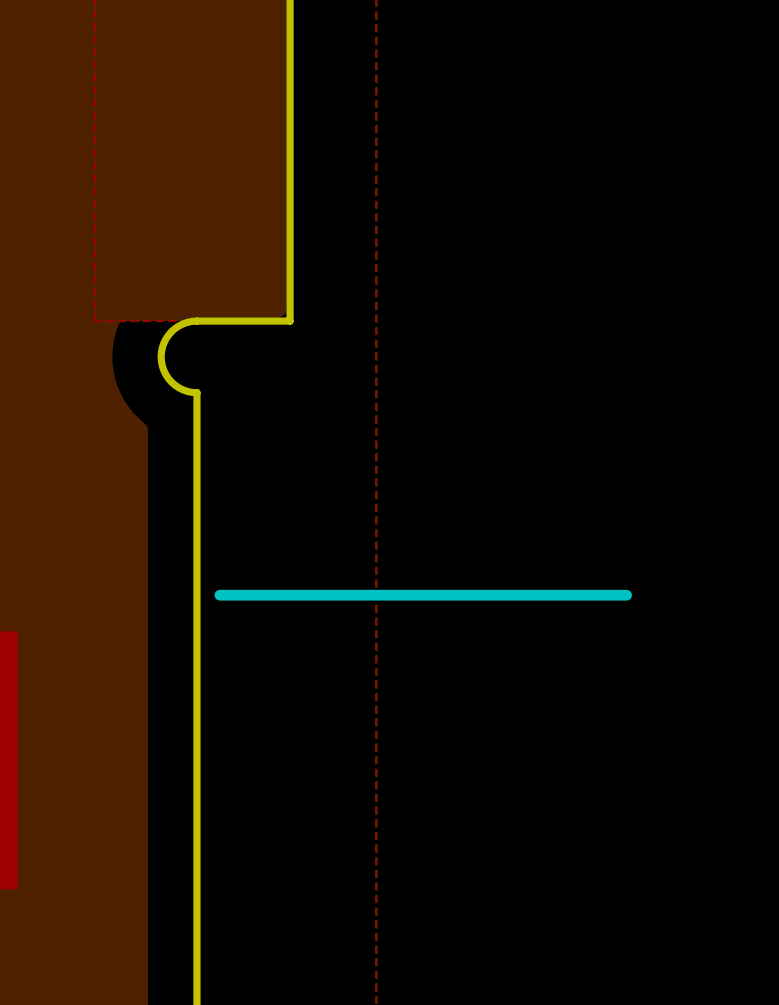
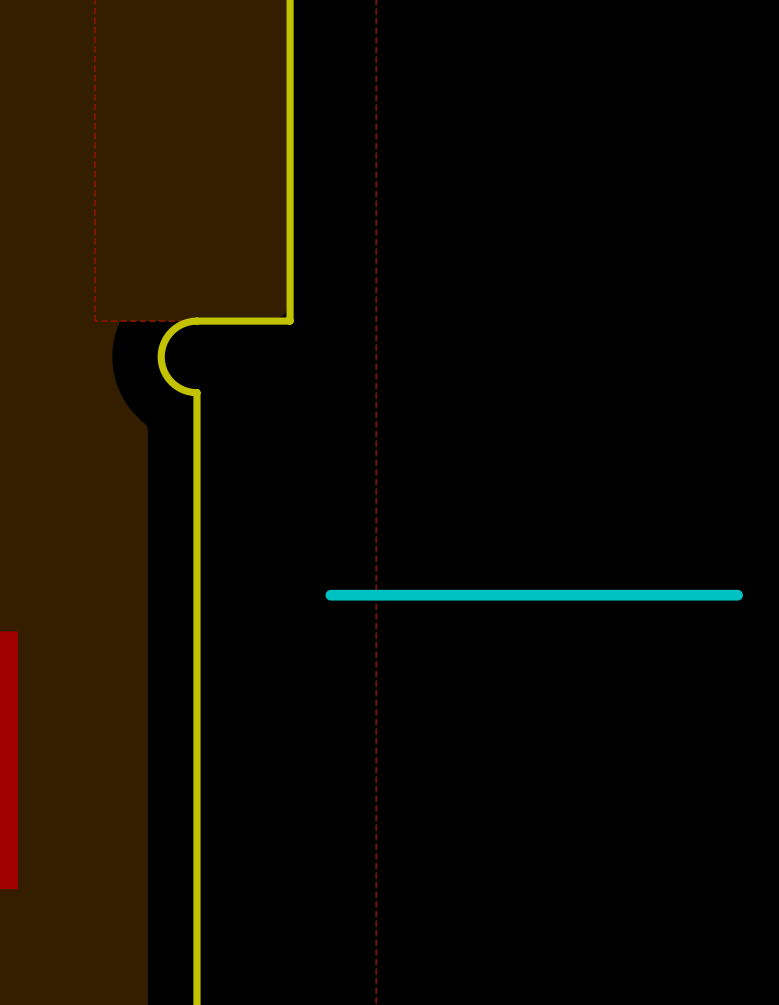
line: (219, 595) (330, 595) -> (626, 595) (737, 595)

